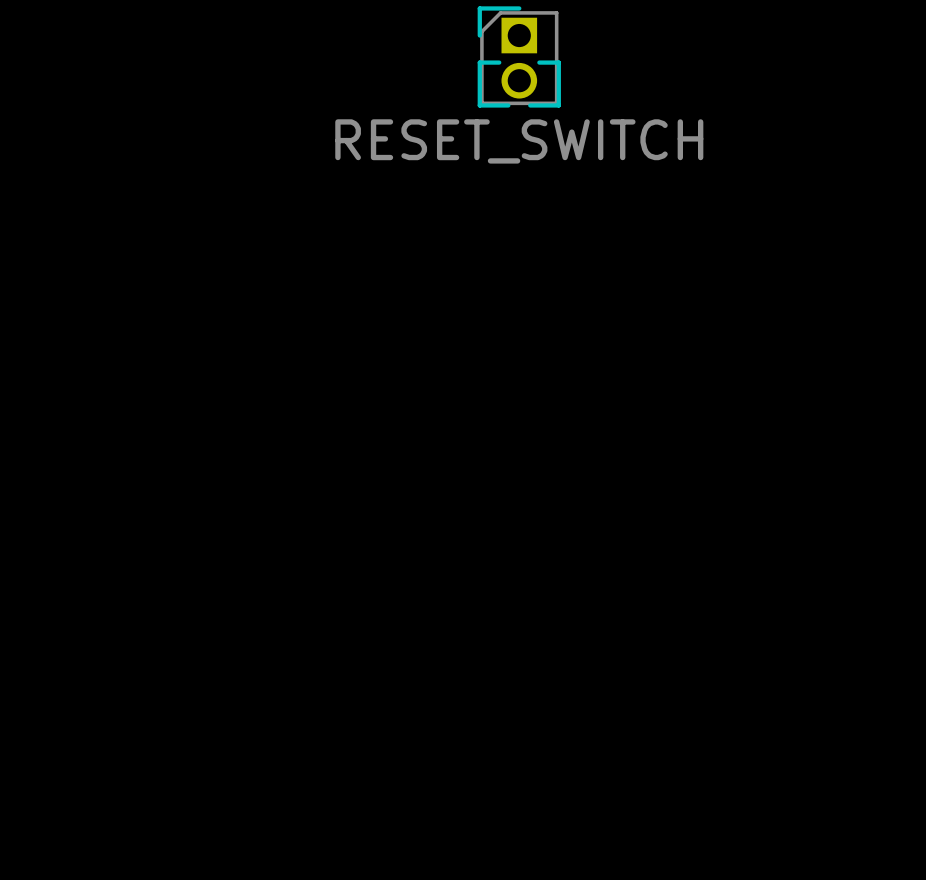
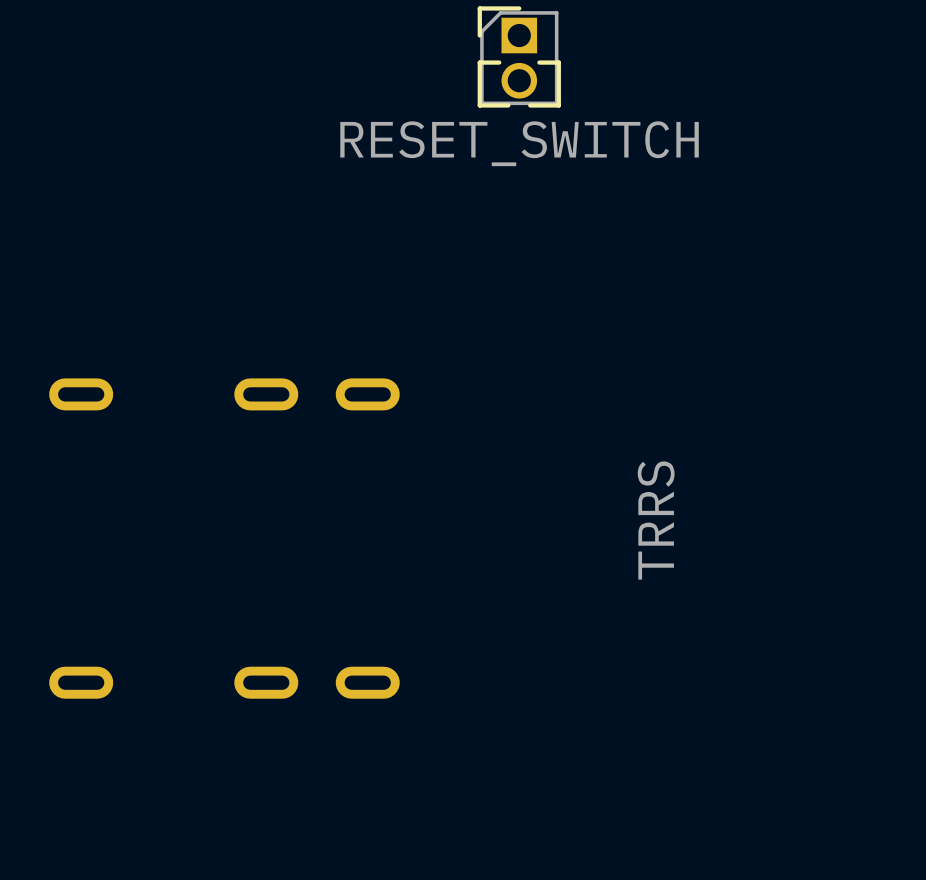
part: none -> TRRS (224, 538)

